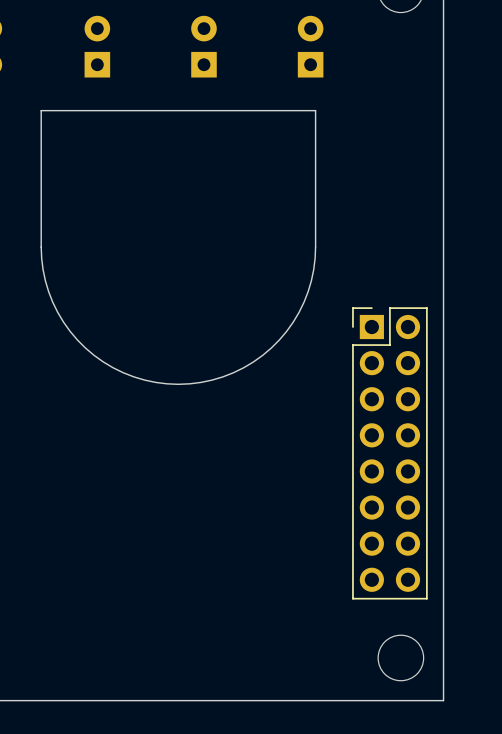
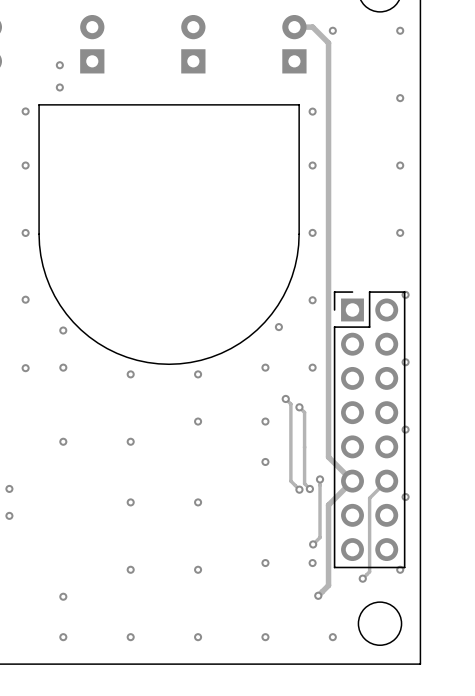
track: none -> (294, 27) (312, 27) (328, 42) (328, 457) (352, 481) (328, 505) (328, 585) (318, 595)
part: none -> (332, 30)
part: none -> (400, 30)
part: none -> (59, 65)
part: none -> (59, 87)
part: none -> (400, 98)
part: none -> (25, 111)
part: none -> (312, 111)
part: none -> (25, 165)
part: none -> (312, 165)
part: none -> (400, 165)
part: none -> (25, 232)
part: none -> (312, 232)
part: none -> (400, 232)
part: none -> (405, 294)
part: none -> (25, 299)
part: none -> (312, 300)
part: none -> (278, 327)
part: none -> (63, 330)
part: none -> (405, 362)
part: none -> (63, 367)
part: none -> (265, 367)
part: none -> (312, 367)
part: none -> (25, 368)
part: none -> (130, 374)
part: none -> (198, 374)
track: none -> (285, 398) (290, 404) (290, 481) (299, 489)
via: none -> (285, 398)
track: none -> (299, 407) (304, 412) (304, 483) (309, 488)
via: none -> (299, 407)
part: none -> (198, 421)
part: none -> (265, 421)
part: none -> (405, 429)
part: none -> (63, 441)
part: none -> (130, 441)
part: none -> (265, 461)
track: none -> (320, 479) (320, 537) (313, 544)
via: none -> (320, 479)
track: none -> (386, 481) (369, 498) (369, 571) (362, 578)
part: none -> (9, 488)
via: none -> (309, 488)
via: none -> (299, 489)
part: none -> (405, 497)
part: none -> (130, 502)
part: none -> (198, 502)
part: none -> (9, 515)
via: none -> (313, 544)
part: none -> (265, 563)
part: none -> (312, 563)
part: none -> (130, 569)
part: none -> (198, 569)
part: none -> (400, 569)
via: none -> (362, 578)
via: none -> (318, 595)
part: none -> (63, 596)
part: none -> (63, 637)
part: none -> (130, 637)
part: none -> (198, 637)
part: none -> (265, 637)
part: none -> (332, 637)

